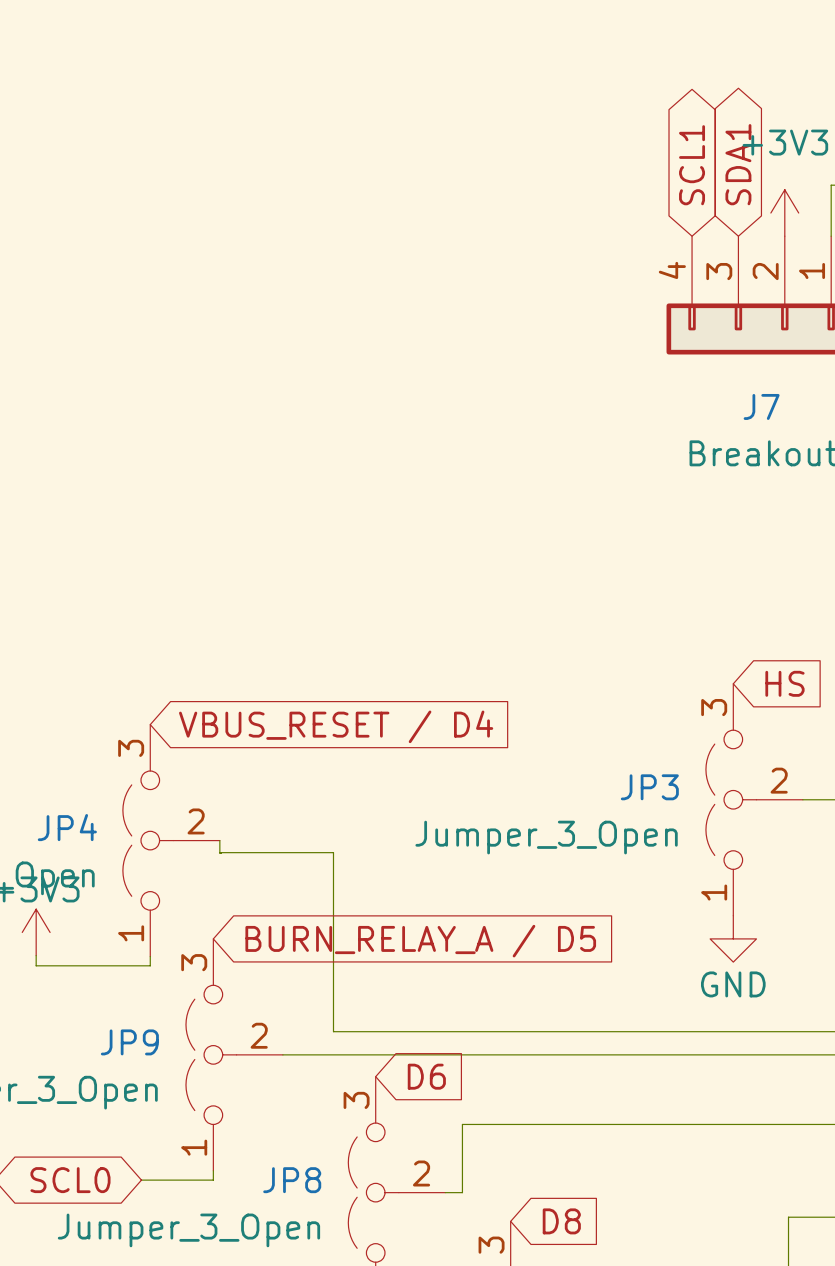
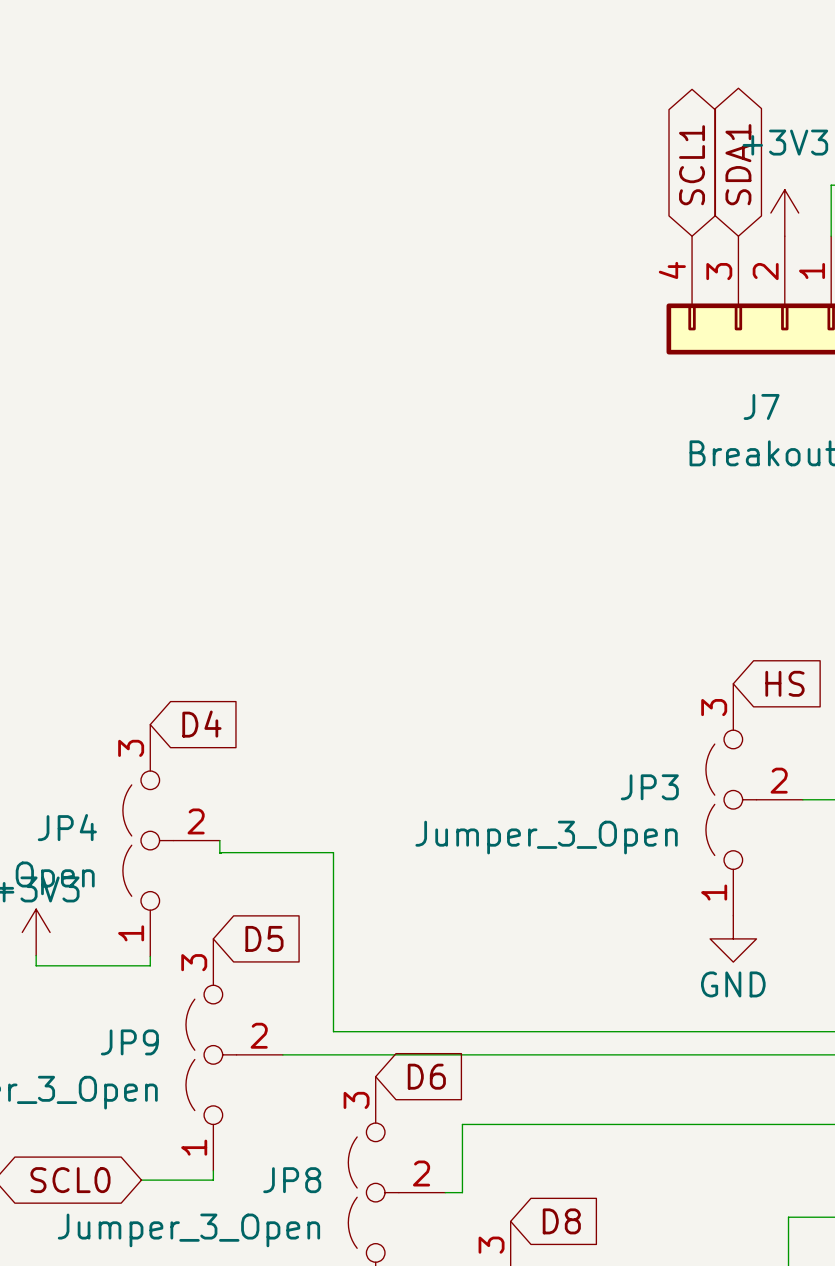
global label: VBUS_RESET / D4 (336, 726) -> D4 (201, 724)
global label: BURN_RELAY_A / D5 (420, 941) -> D5 (264, 938)

